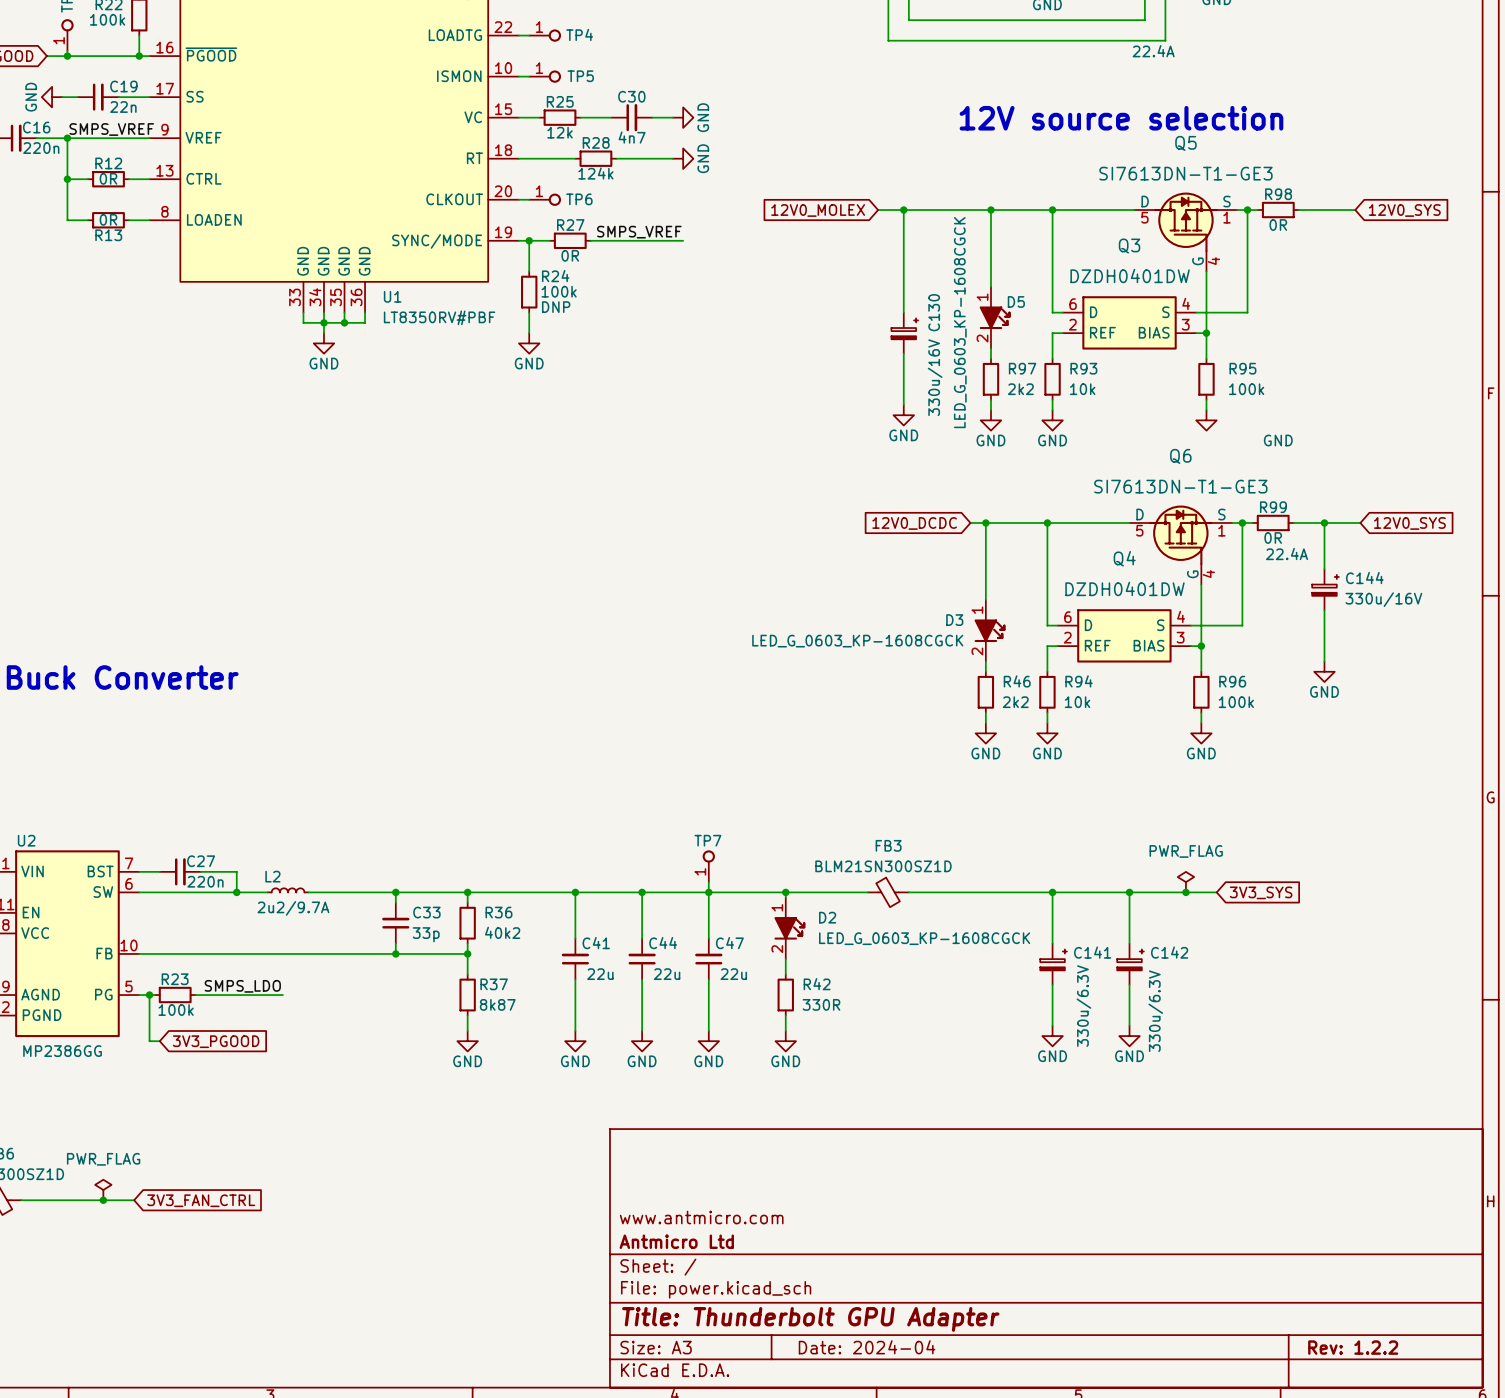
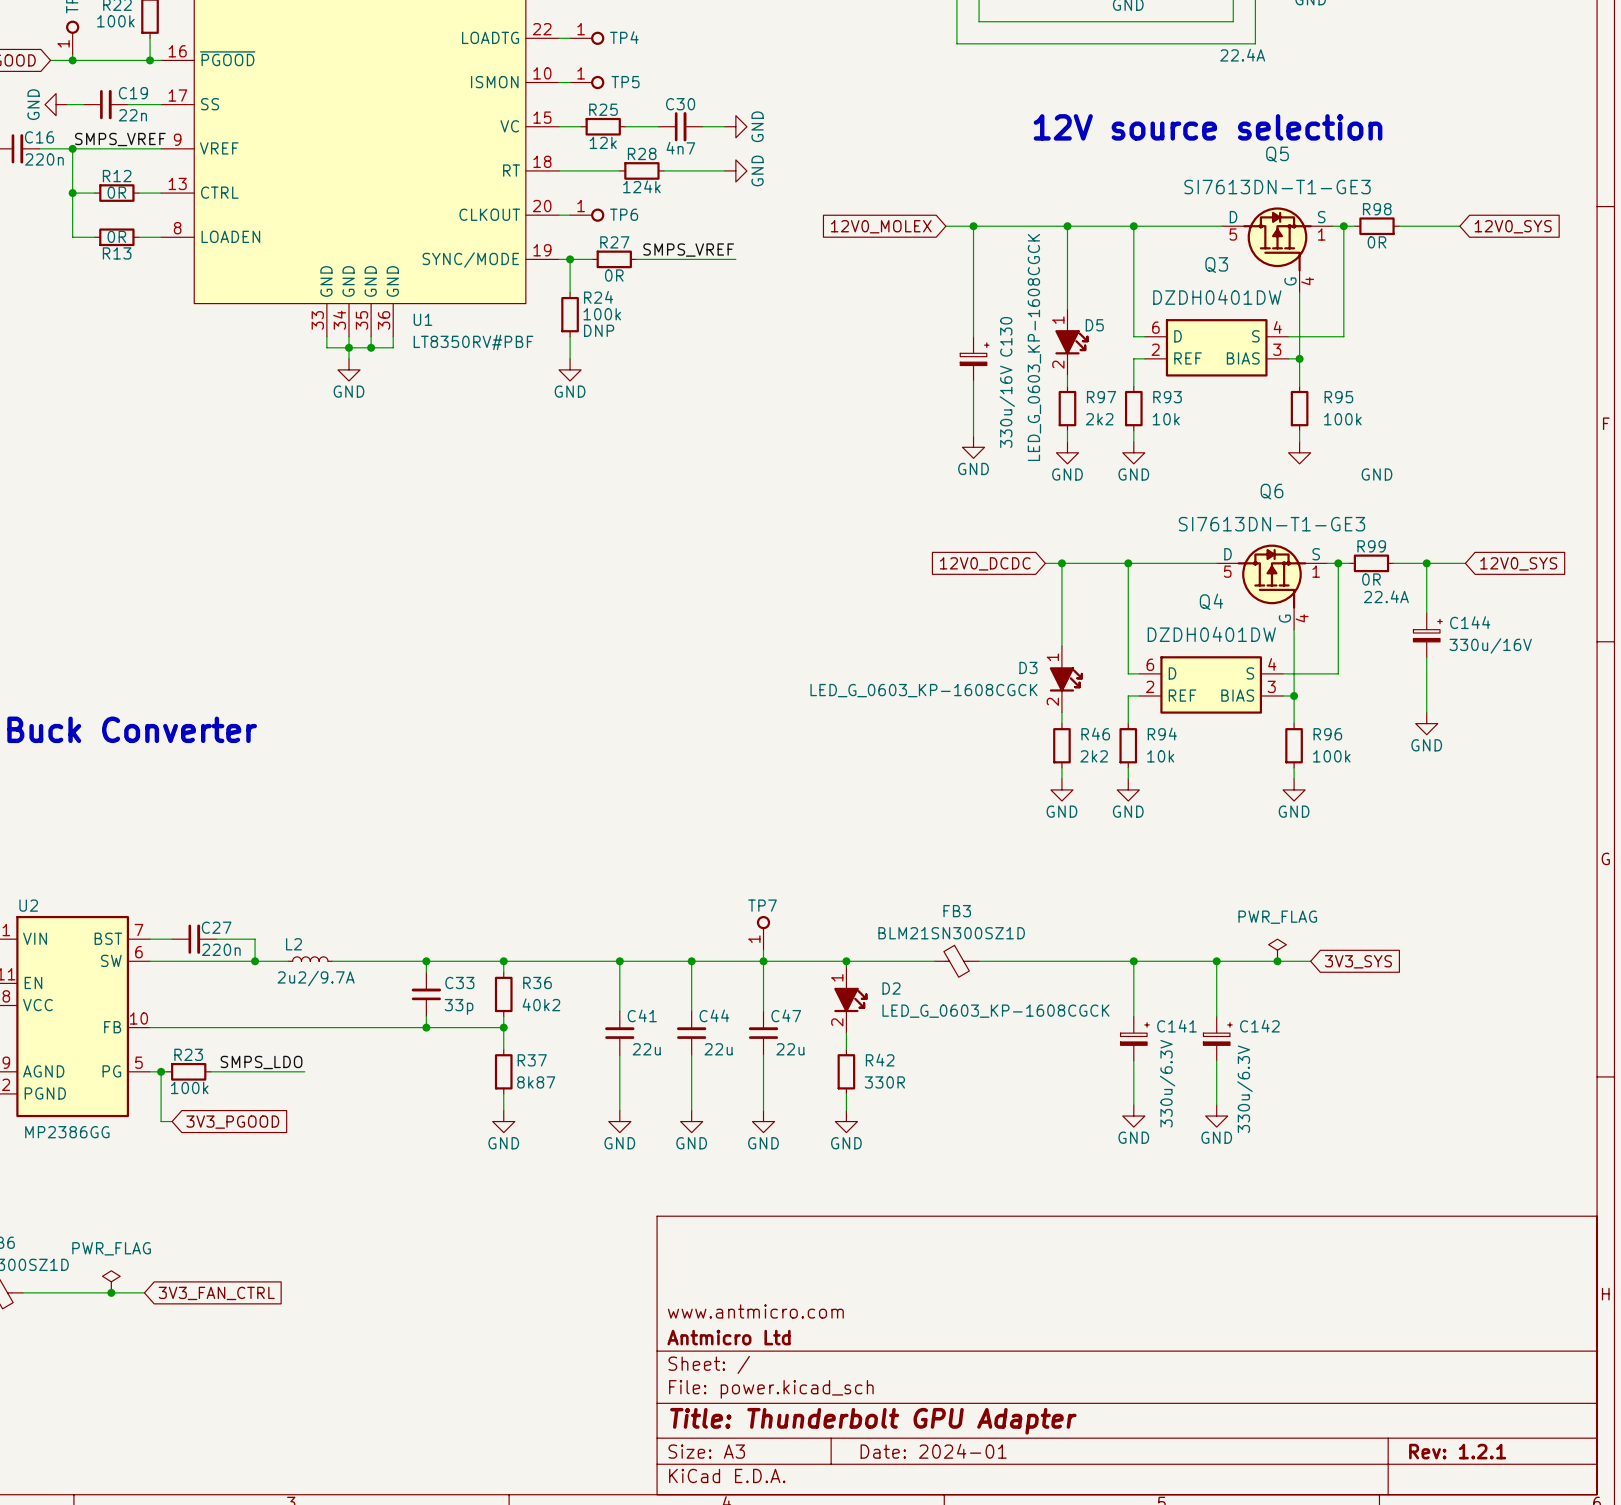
title block: Date: 2024-04 (867, 1347) -> Date: 2024-01 (933, 1451)
title block: Rev: 1.2.2 (1353, 1347) -> Rev: 1.2.1 (1457, 1451)

